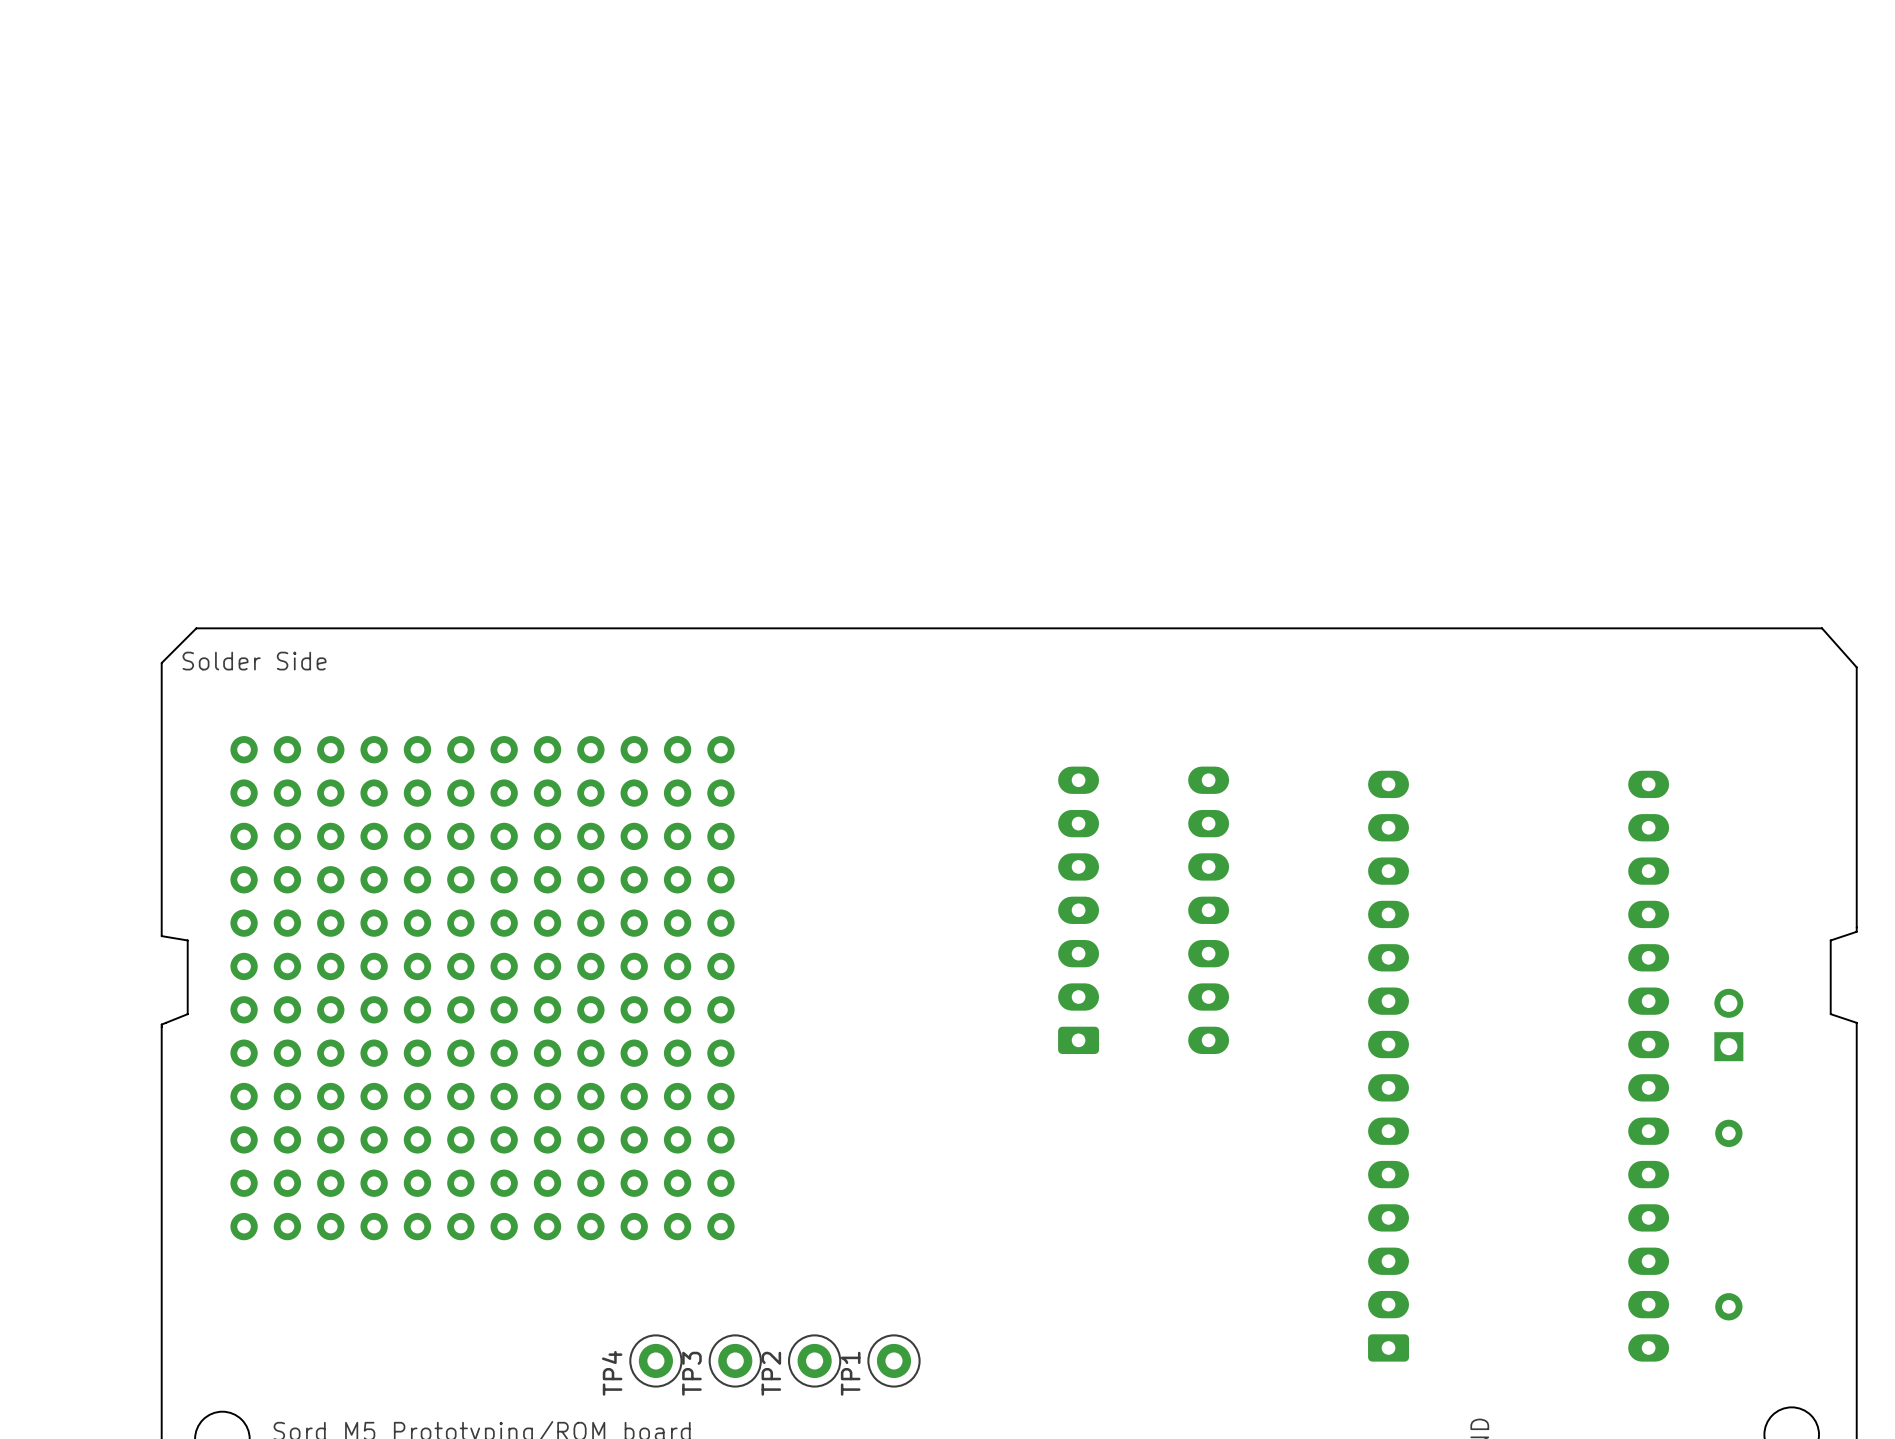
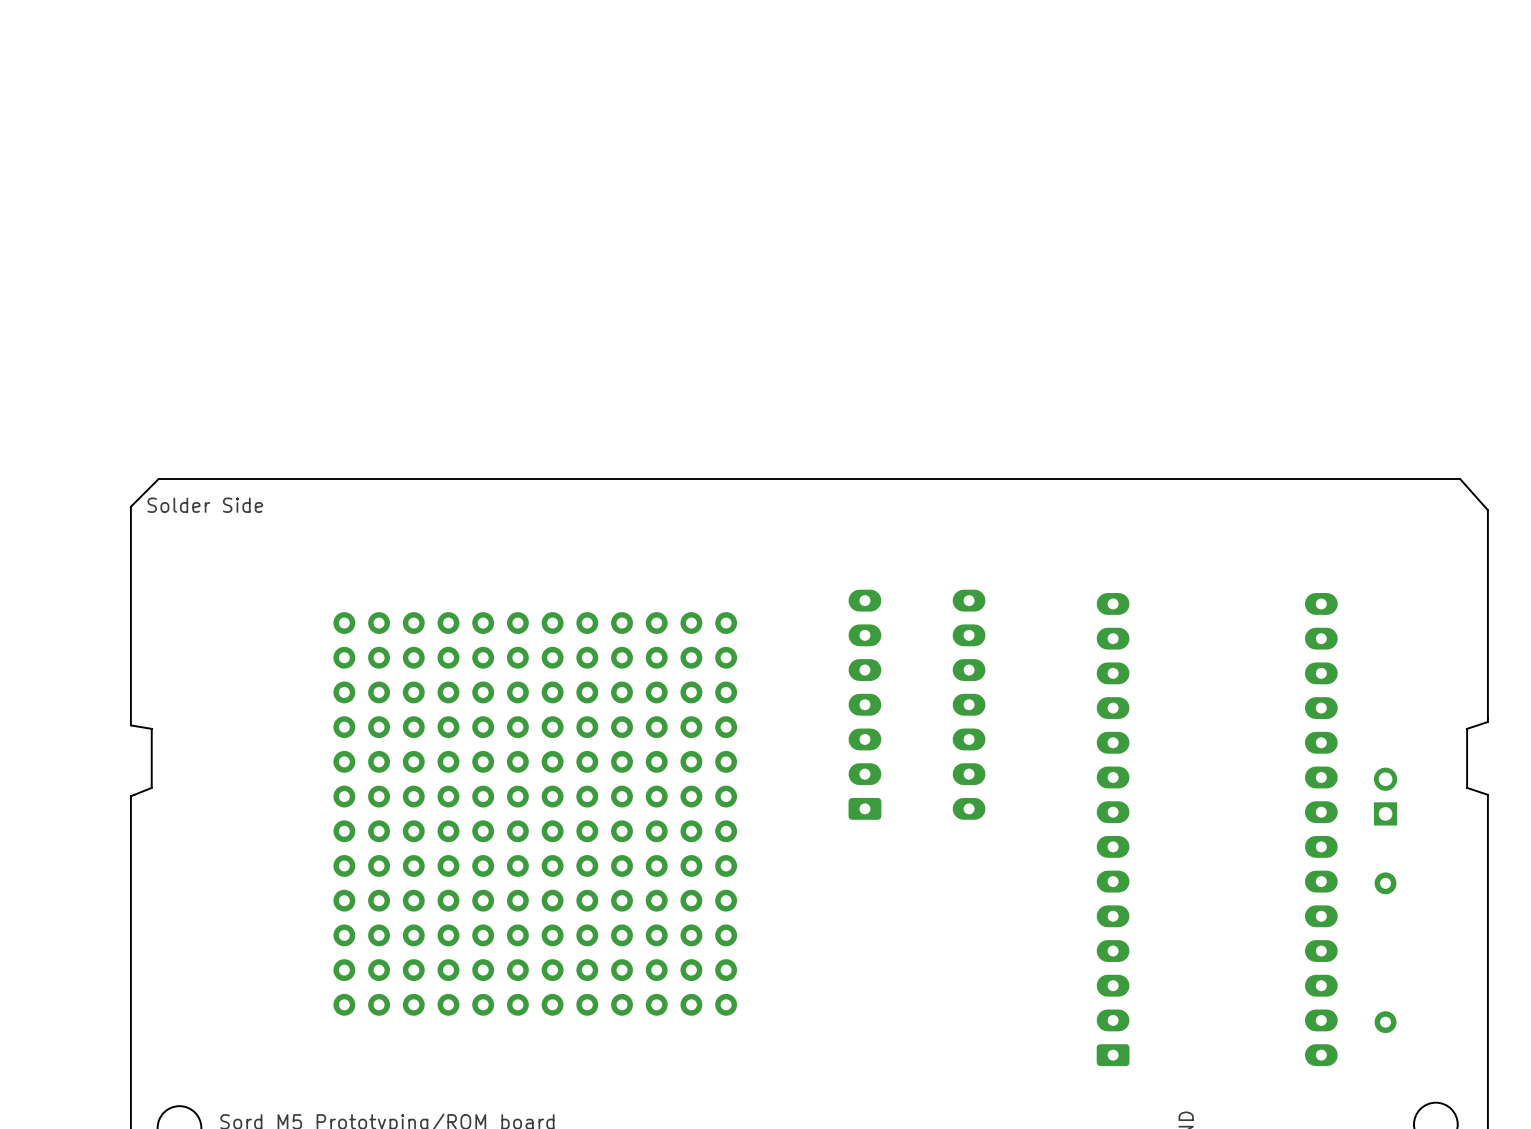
part position: (482, 988) -> (535, 813)
TP4: (655, 1360) -> none
TP3: (735, 1360) -> none
TP2: (814, 1360) -> none
TP1: (893, 1360) -> none

